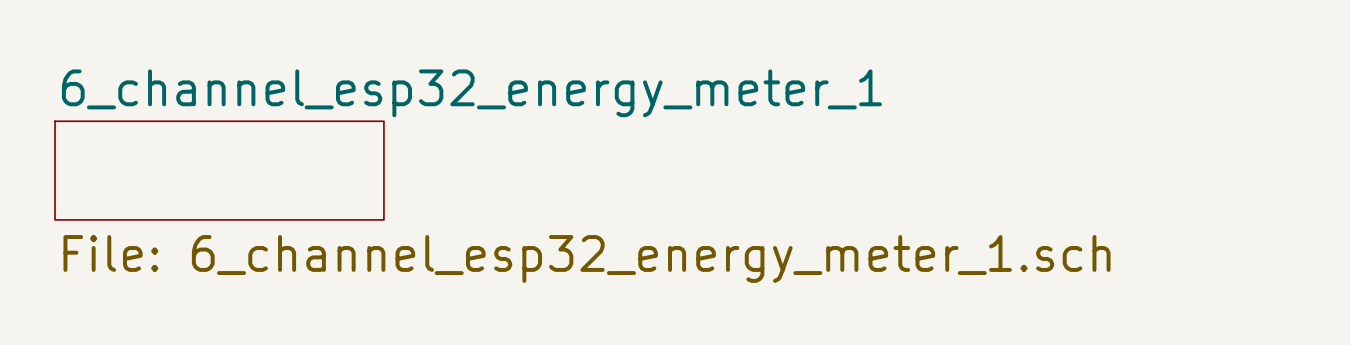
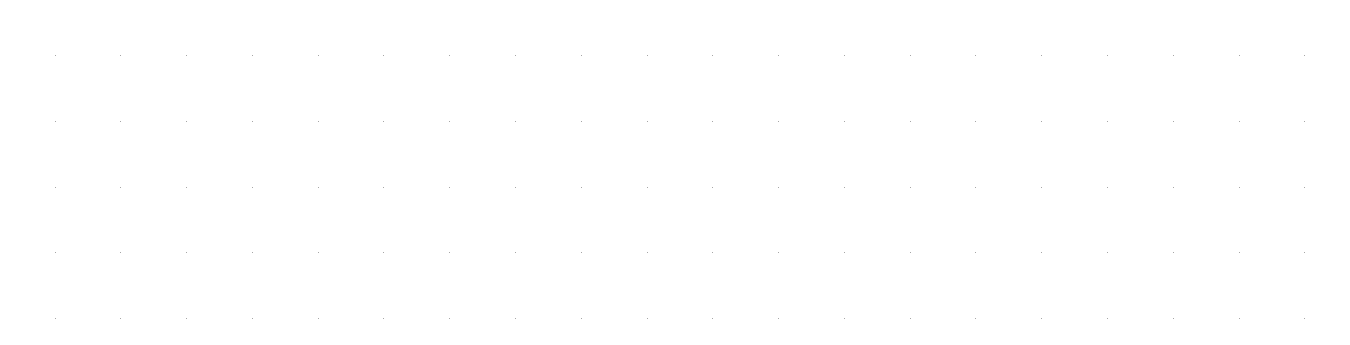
sheet 6_channel_esp32_energy_meter_1: File: 6_channel_esp32_energy_meter_1.sch (219, 170) -> none

